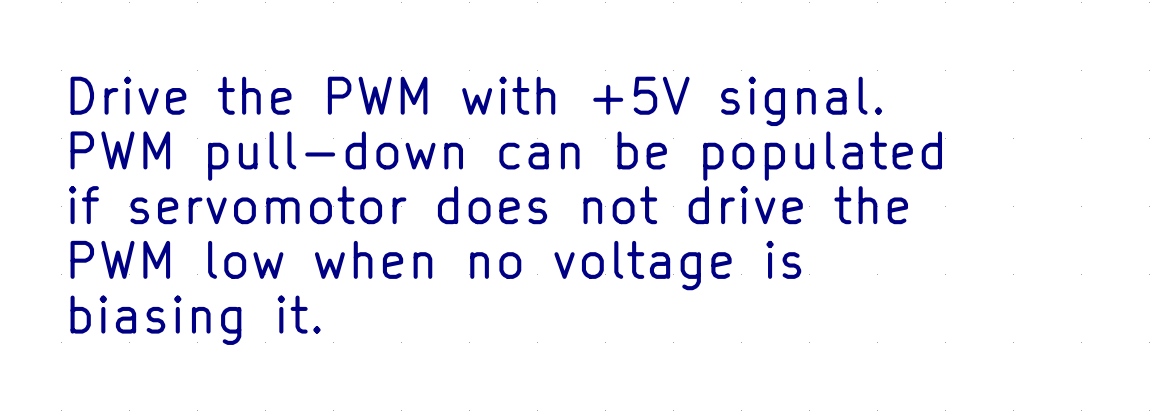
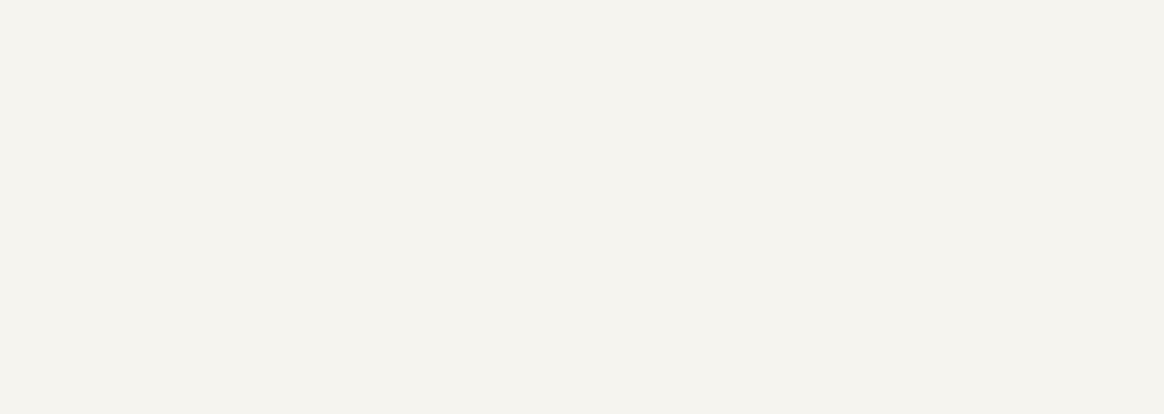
text: Drive the PWM with +5V signal. (476, 101) -> none
text: PWM pull-down can be populated (506, 156) -> none
text: if servomotor does not drive the (488, 205) -> none
text: PWM low when no voltage is (435, 265) -> none
text: biasing it. (195, 320) -> none

